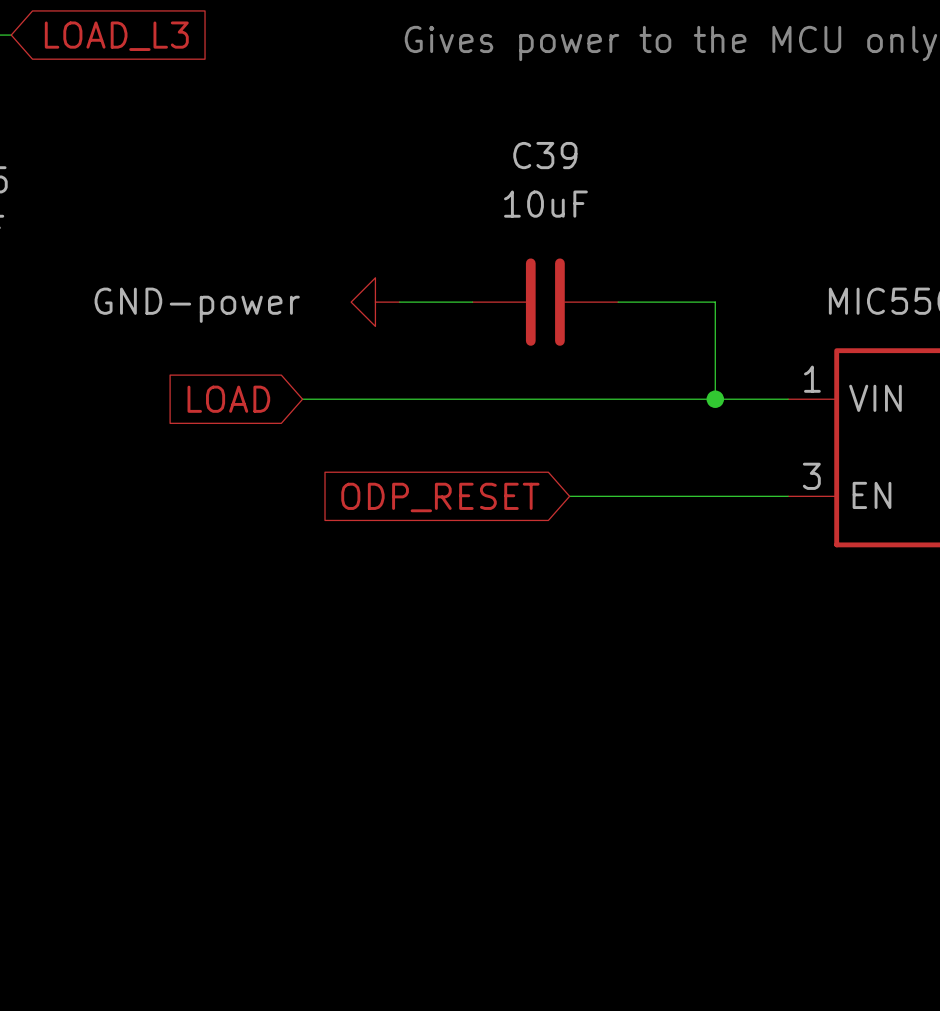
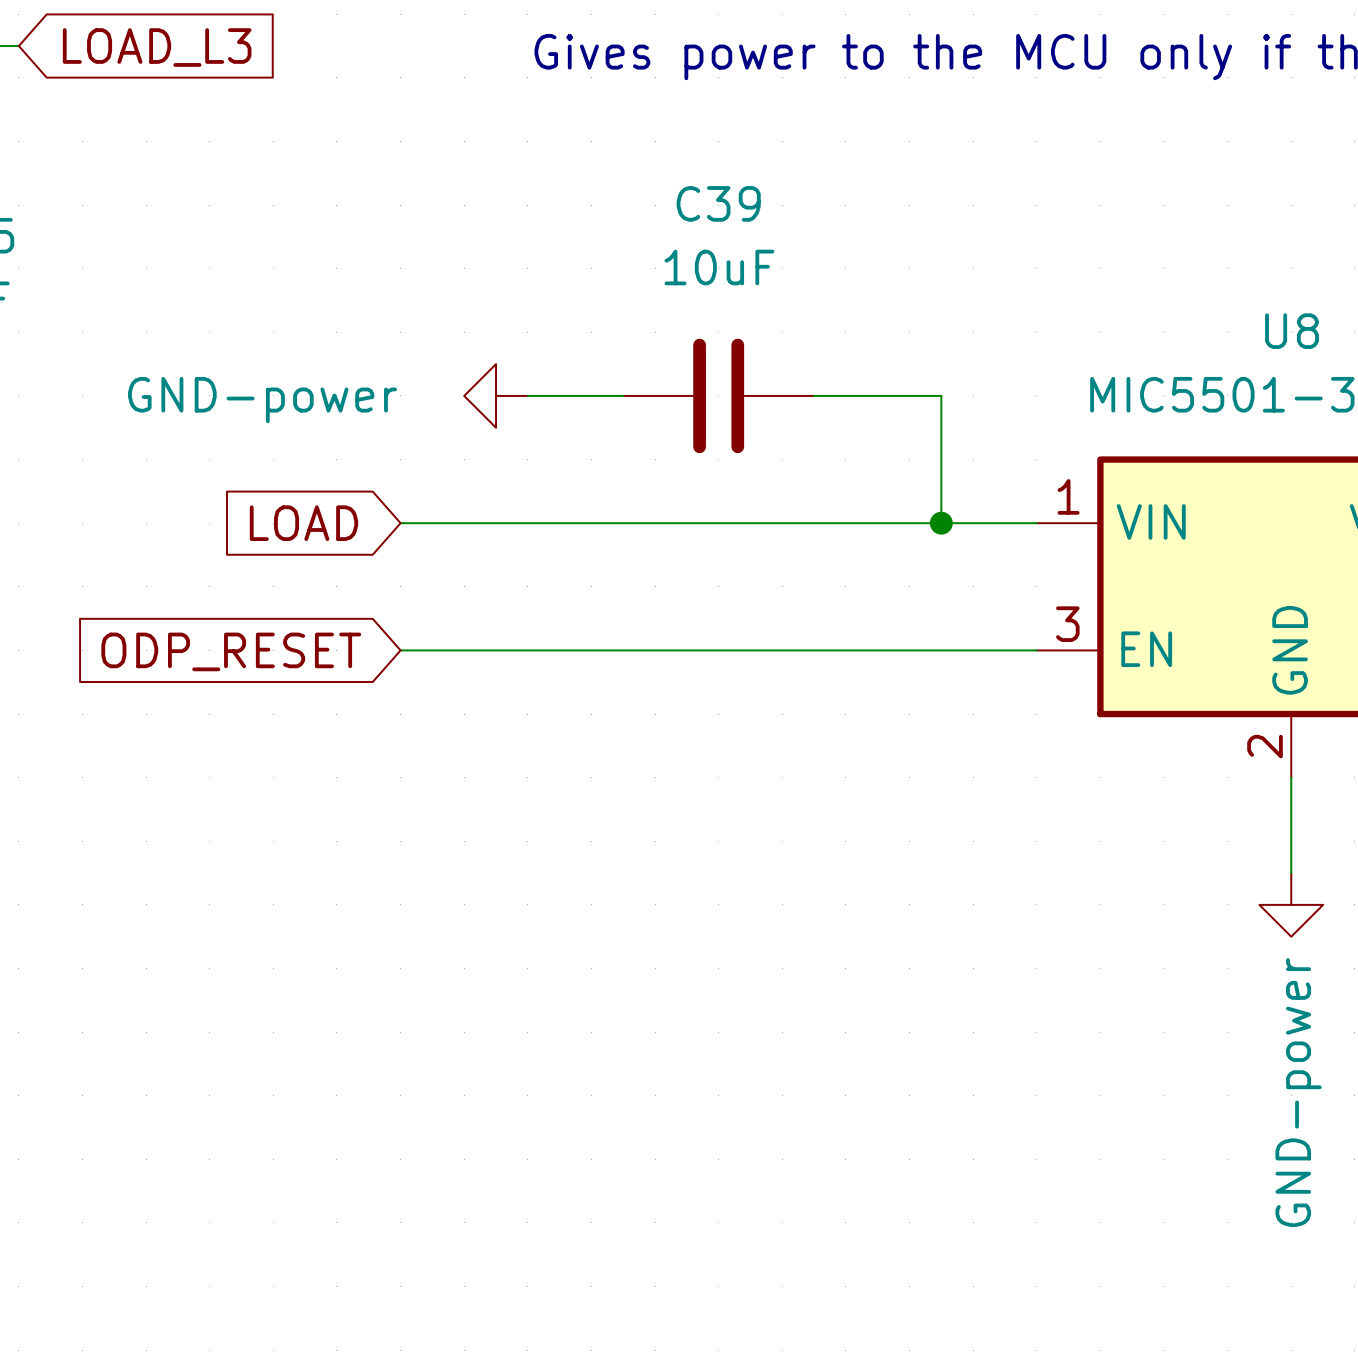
wire: none -> (400, 650) (750, 650)
global label position: ODP_RESET (440, 497) -> ODP_RESET (231, 651)

